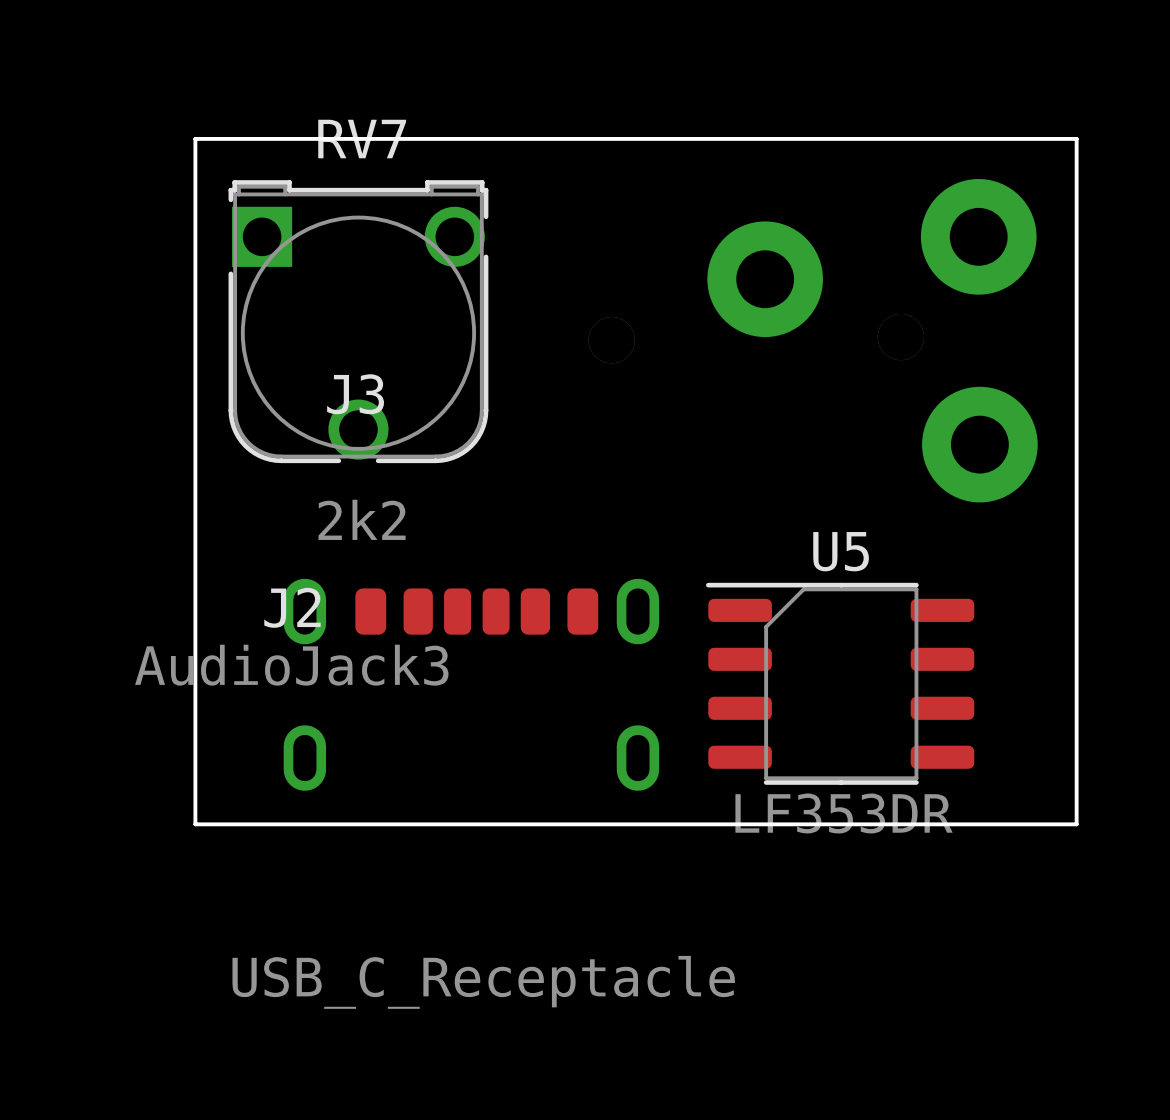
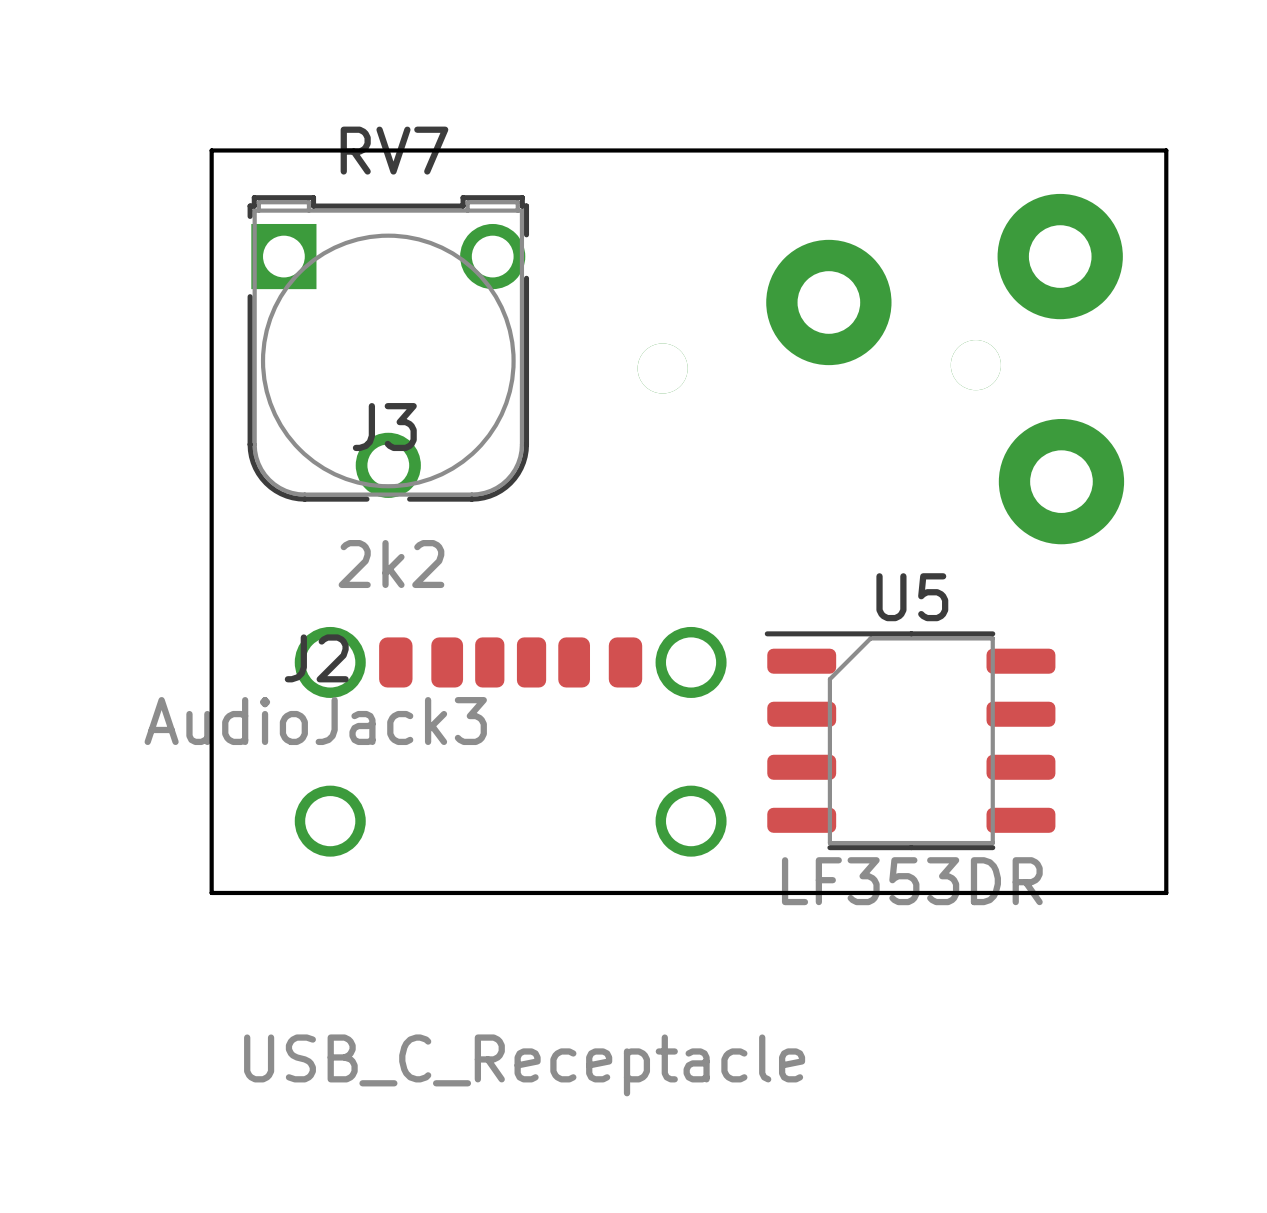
J3 footprint: [283, 578, 660, 791] -> [294, 626, 727, 857]

